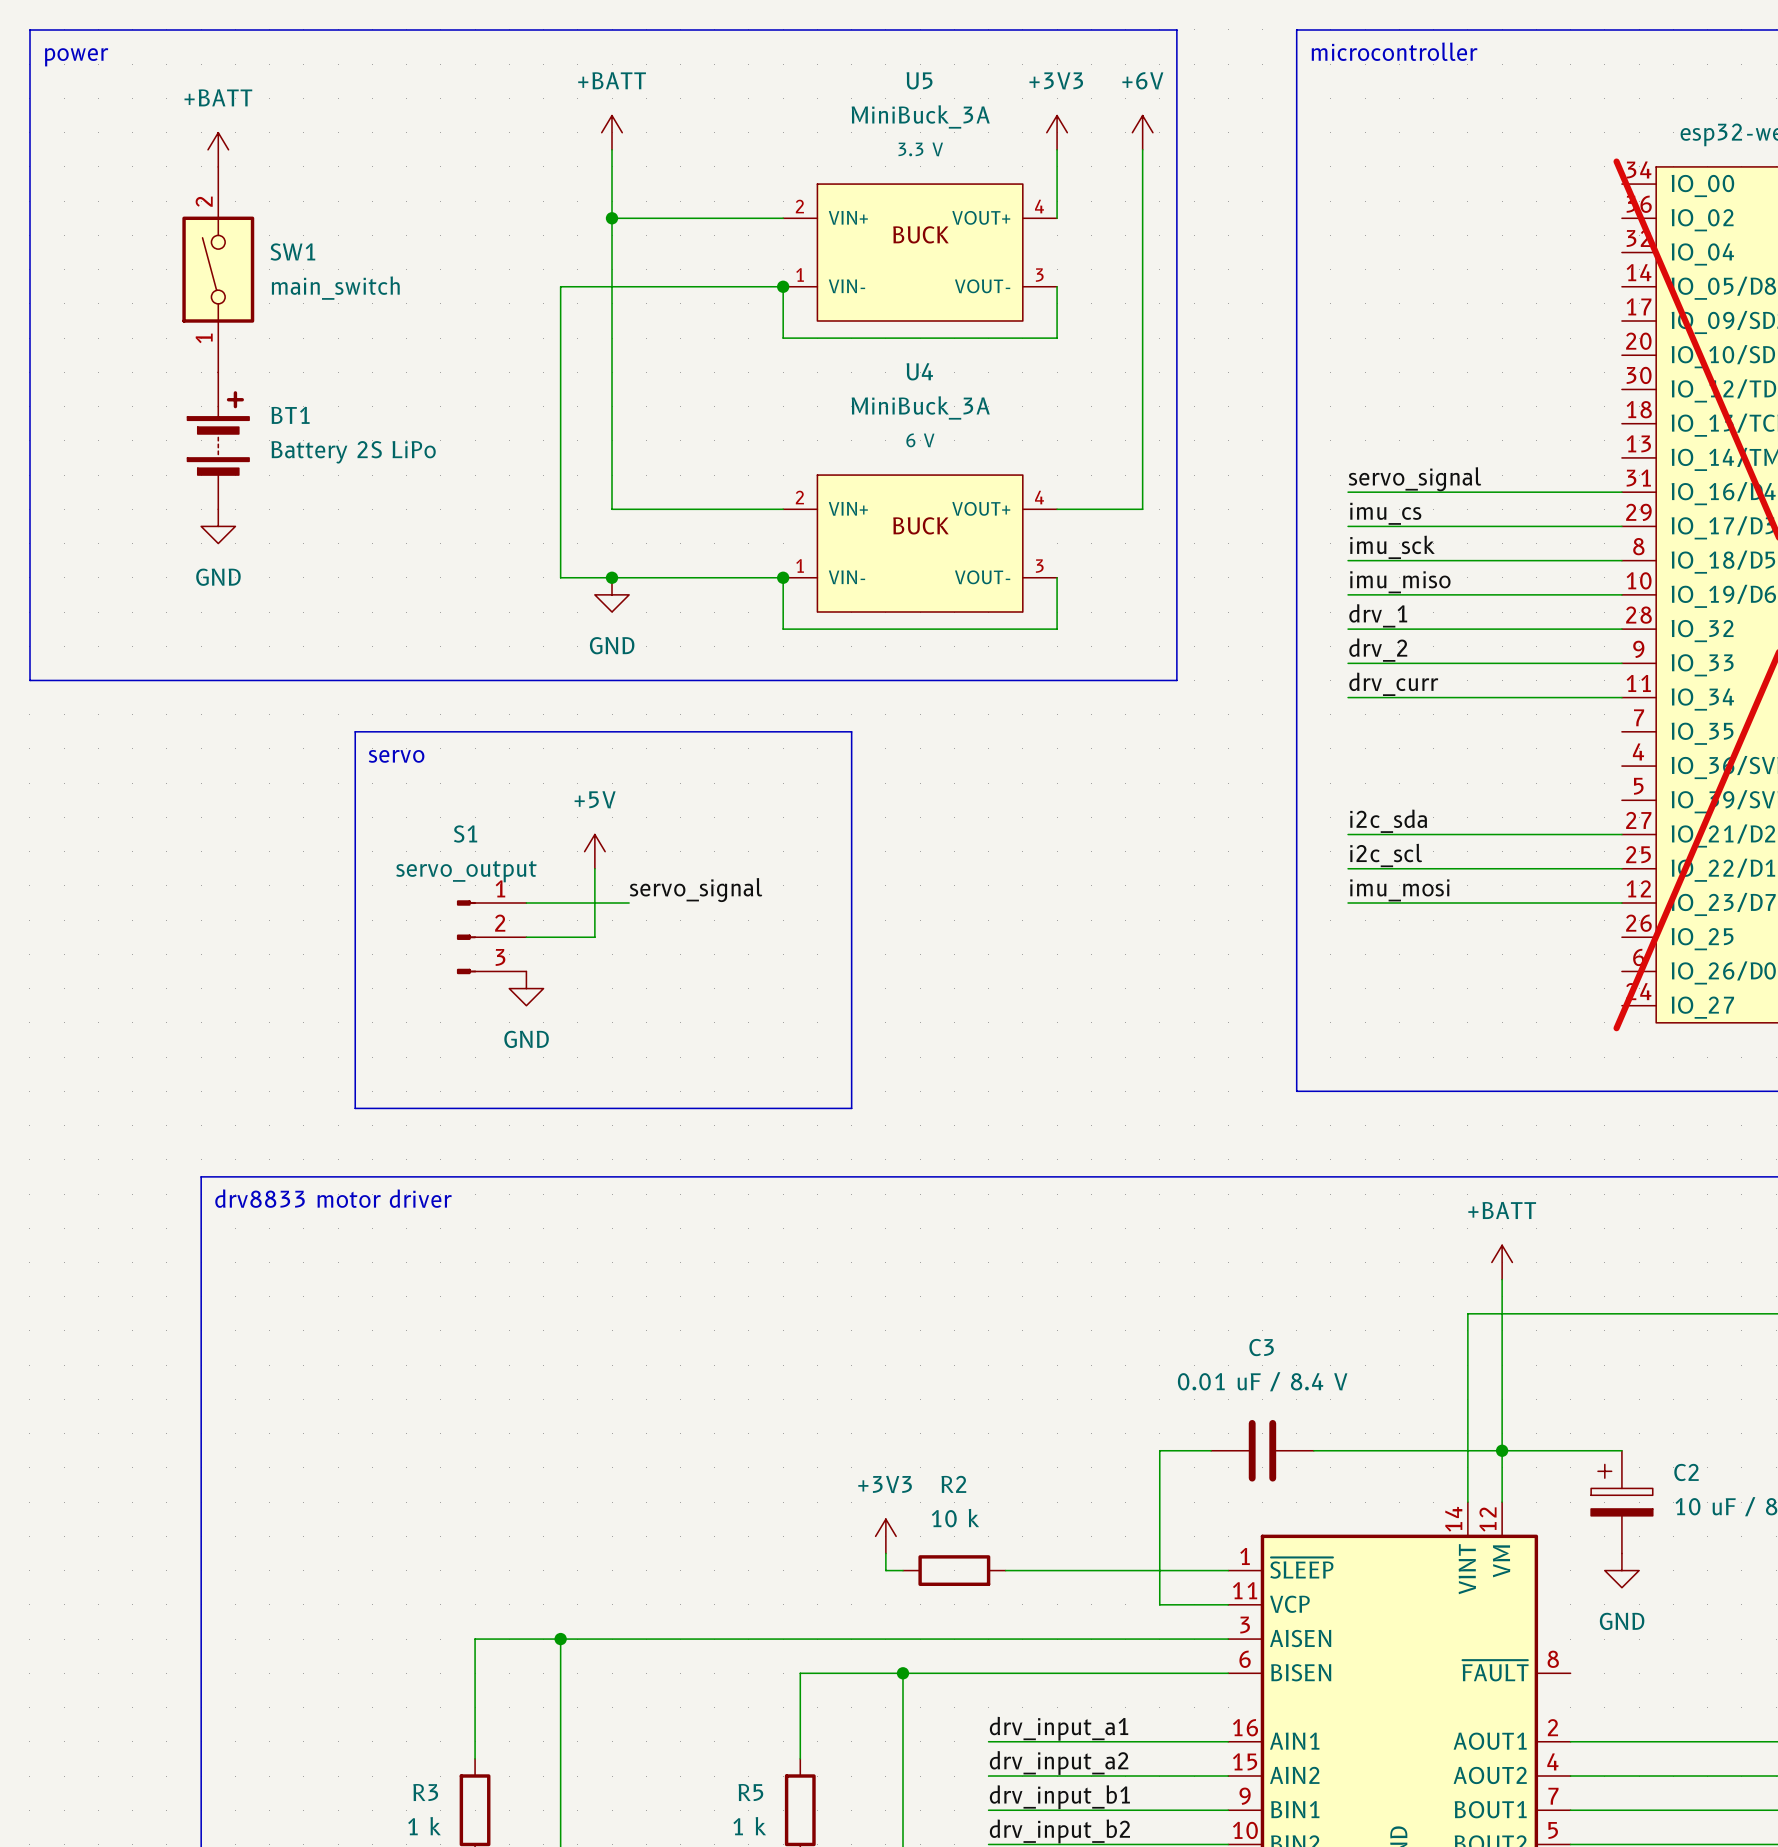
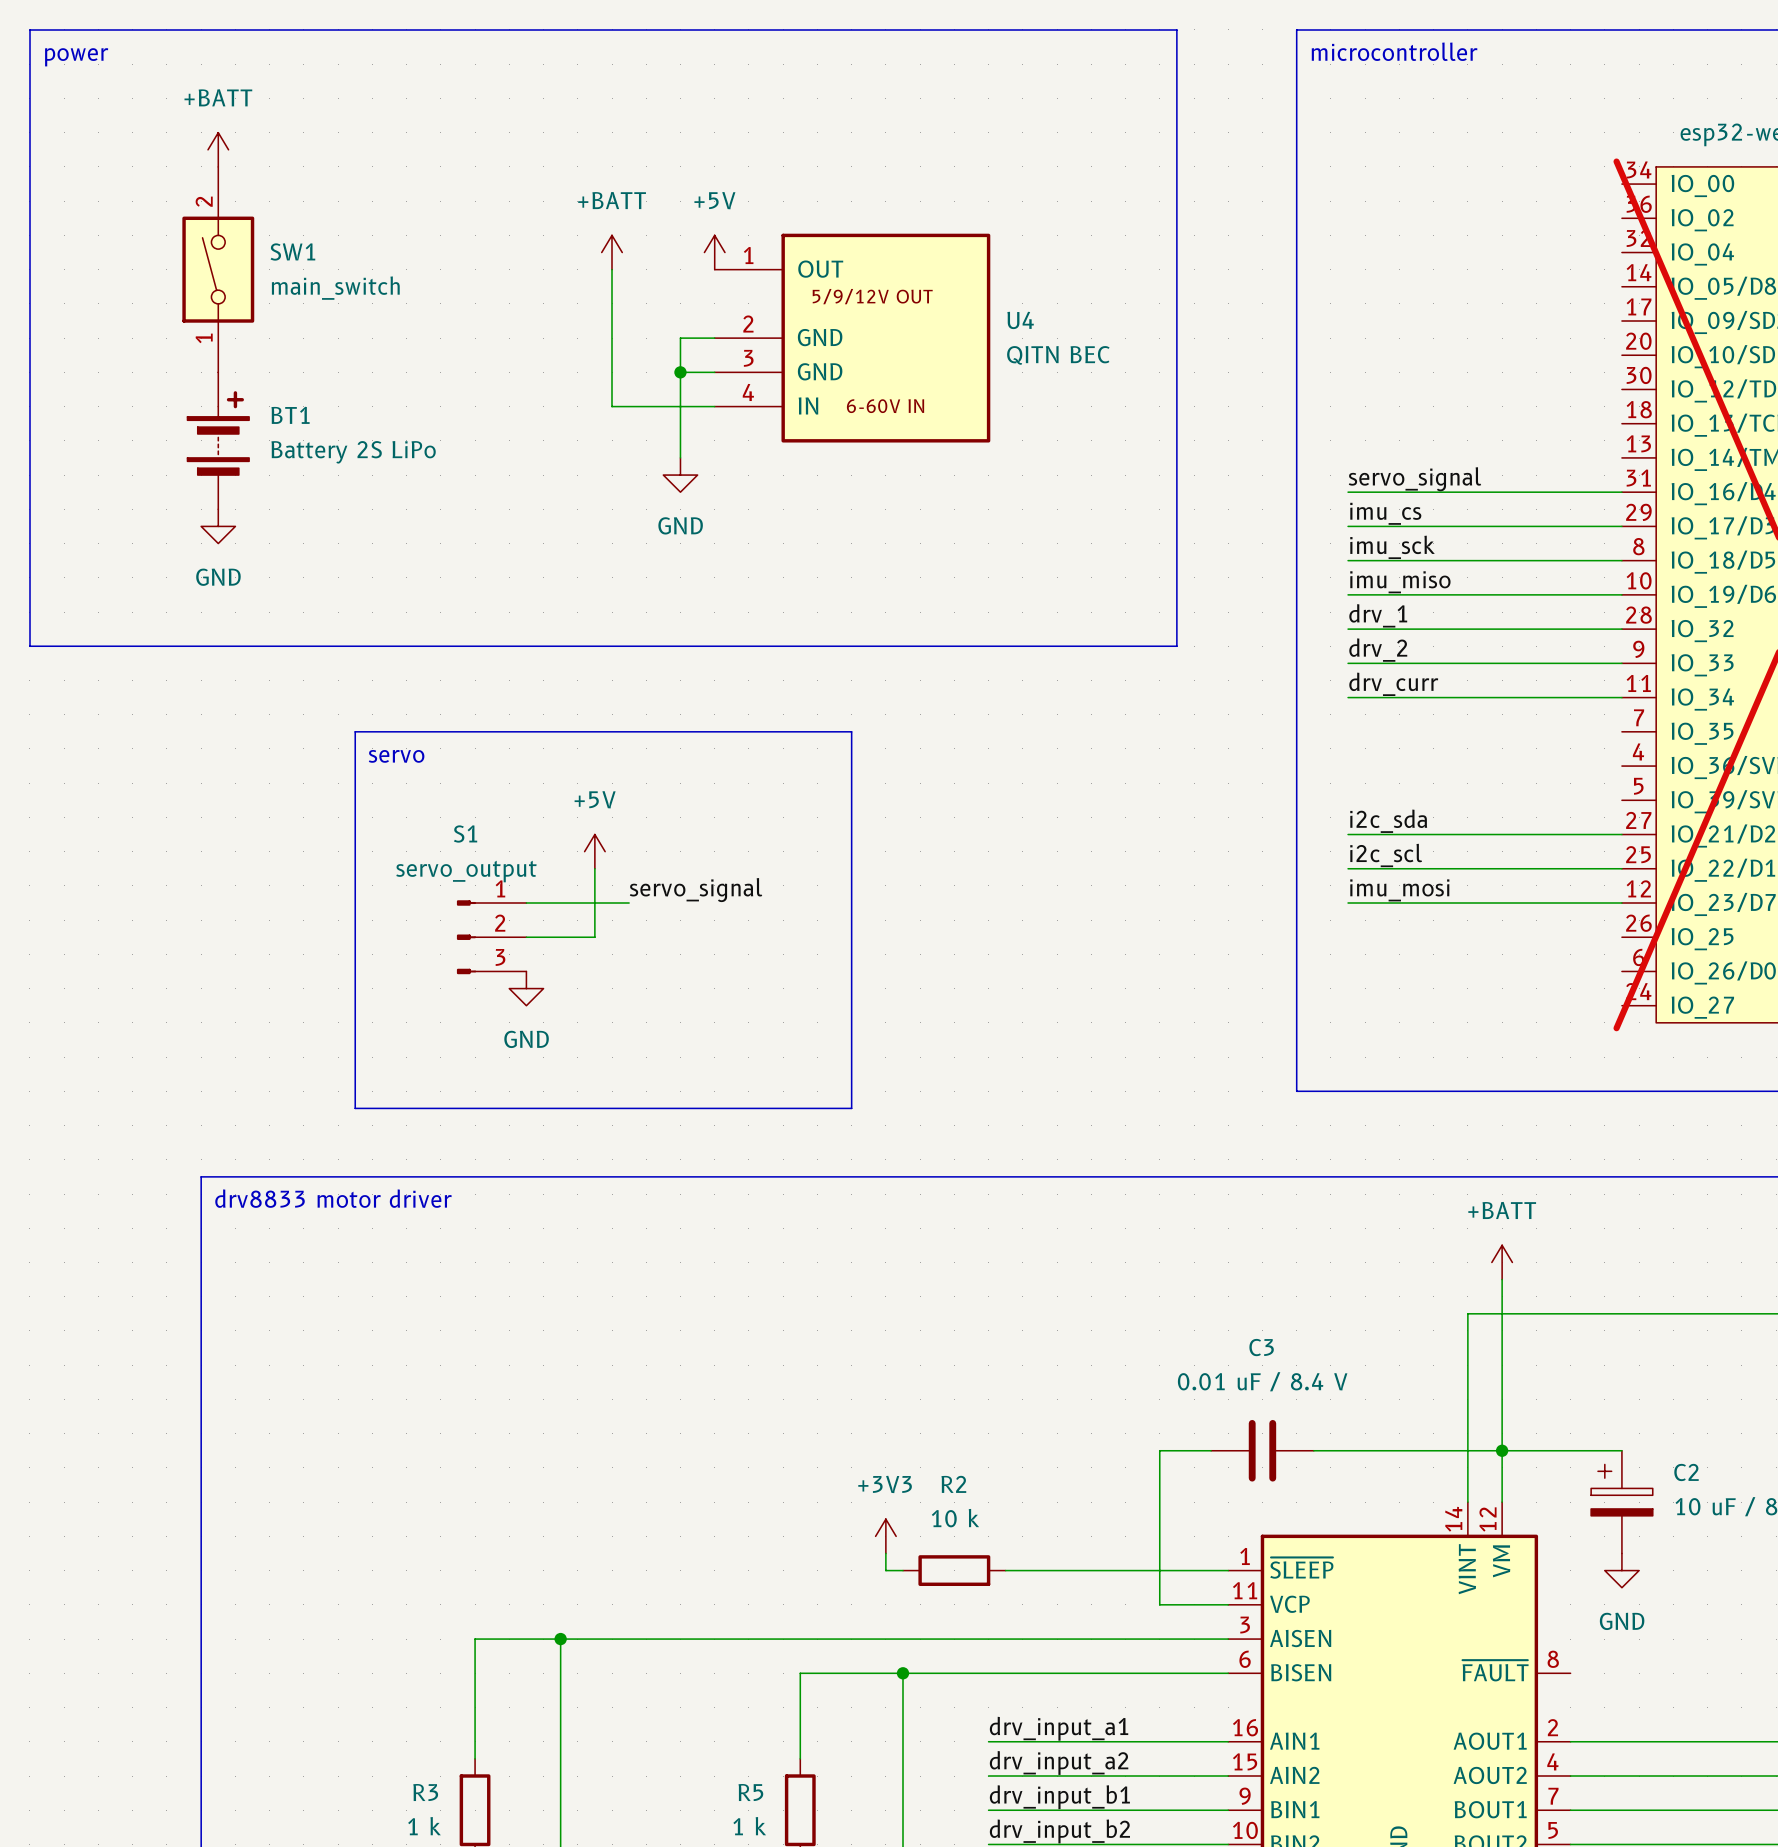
power symbol position: +BATT (612, 132) -> +BATT (612, 252)
power symbol: +3V3 (1057, 132) -> none
power symbol: +6V (1142, 132) -> none
wire: (612, 149) (612, 269) -> none
wire: (1057, 149) (1057, 218) -> none
wire: (1142, 149) (1142, 509) (1057, 509) -> none
wire: (612, 218) (783, 218) -> none
junction: (612, 218) -> none
power symbol: none -> +5V (714, 252)
U5: MiniBuck_3A (920, 252) -> none
junction: (783, 286) -> none
wire: (1057, 286) (1057, 338) (783, 338) (783, 286) (560, 286) (560, 577) (783, 577) (783, 629) (1057, 629) (1057, 577) -> none
wire: none -> (714, 338) (680, 338) (680, 457)
U4 name position: U4 (919, 371) -> U4 (1020, 320)
wire: none -> (680, 372) (714, 372)
junction: none -> (680, 372)
wire: (612, 406) (612, 509) (783, 509) -> (612, 406) (714, 406)
U4 value: MiniBuck_3A (920, 407) -> QITN BEC (1058, 355)
U4 text: 6 V (920, 440) -> none
U4 symbol: [783, 475, 1058, 613] -> [714, 233, 991, 443]
junction: (612, 577) -> none
junction: (783, 577) -> none
power symbol position: GND (612, 594) -> GND (680, 475)
line: (29, 646) (29, 680) (1176, 680) (1176, 646) -> (29, 646) (1176, 646)

